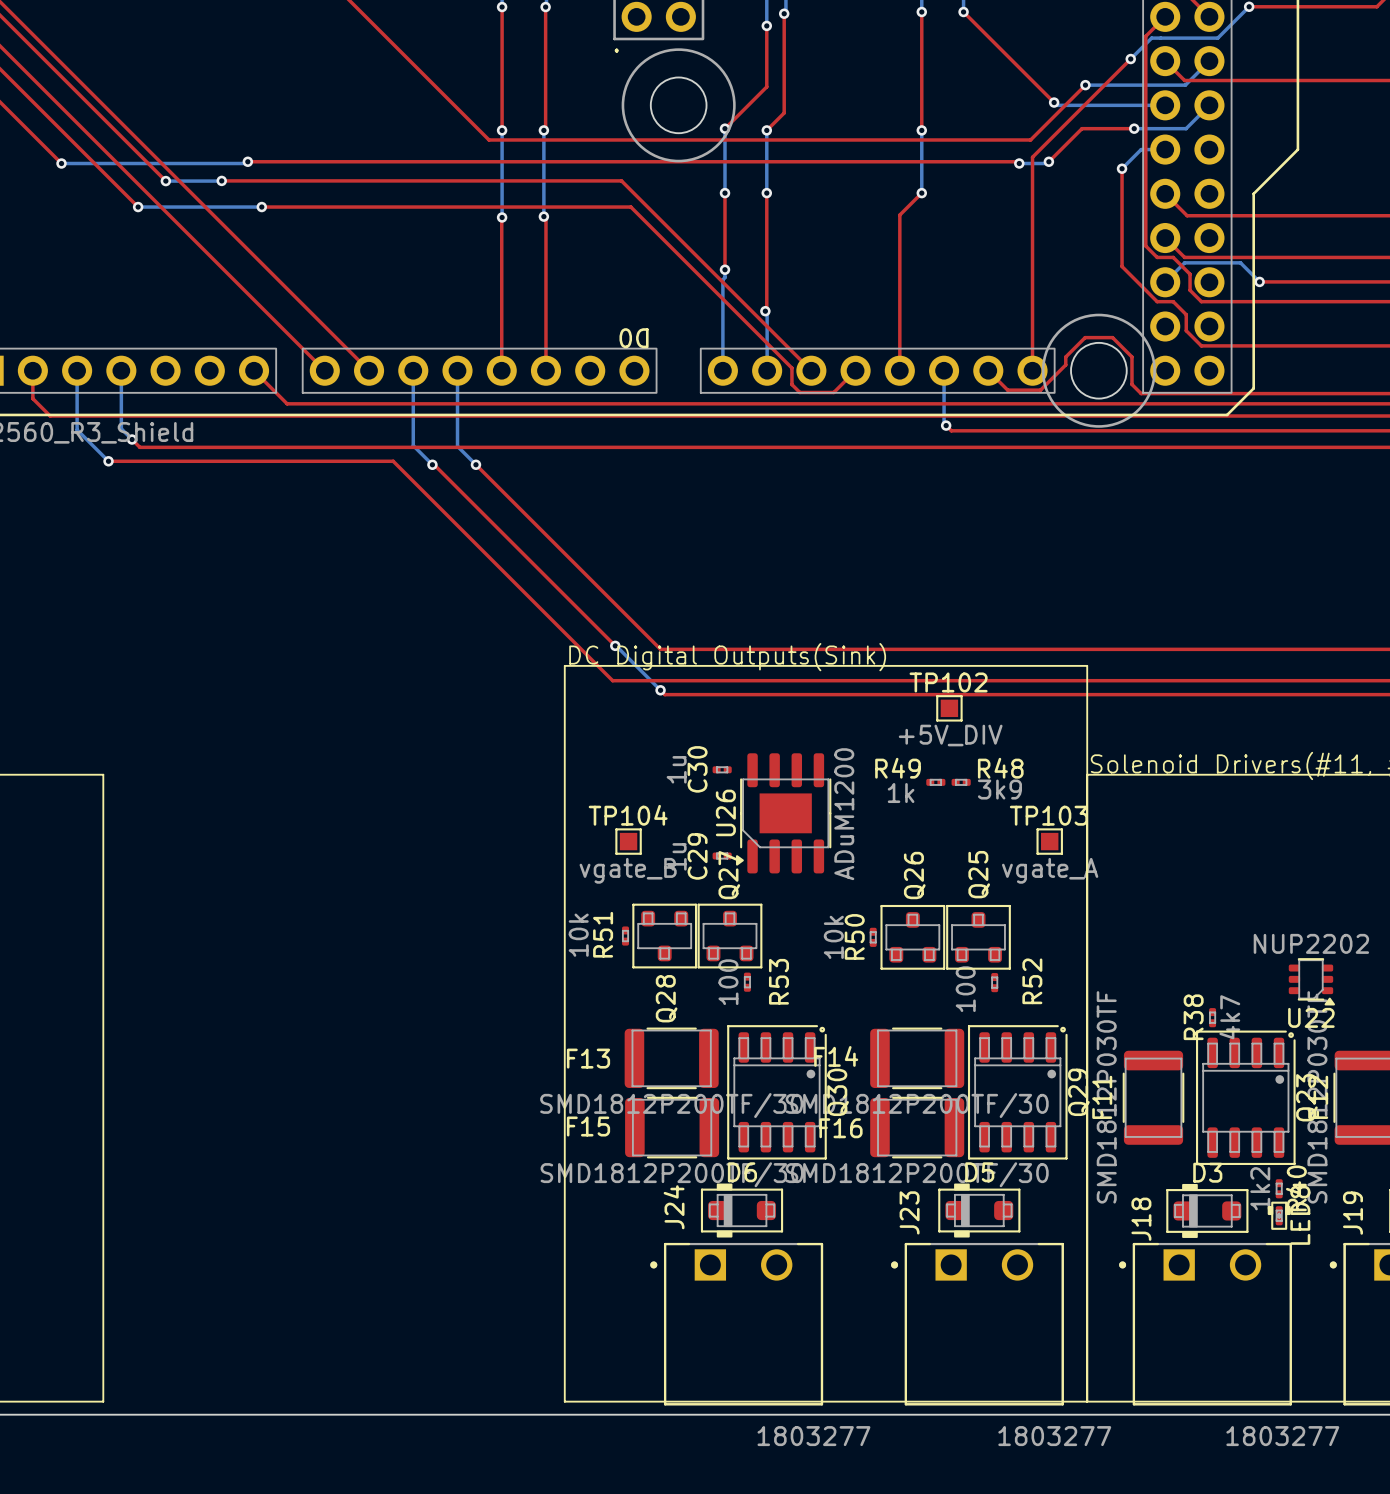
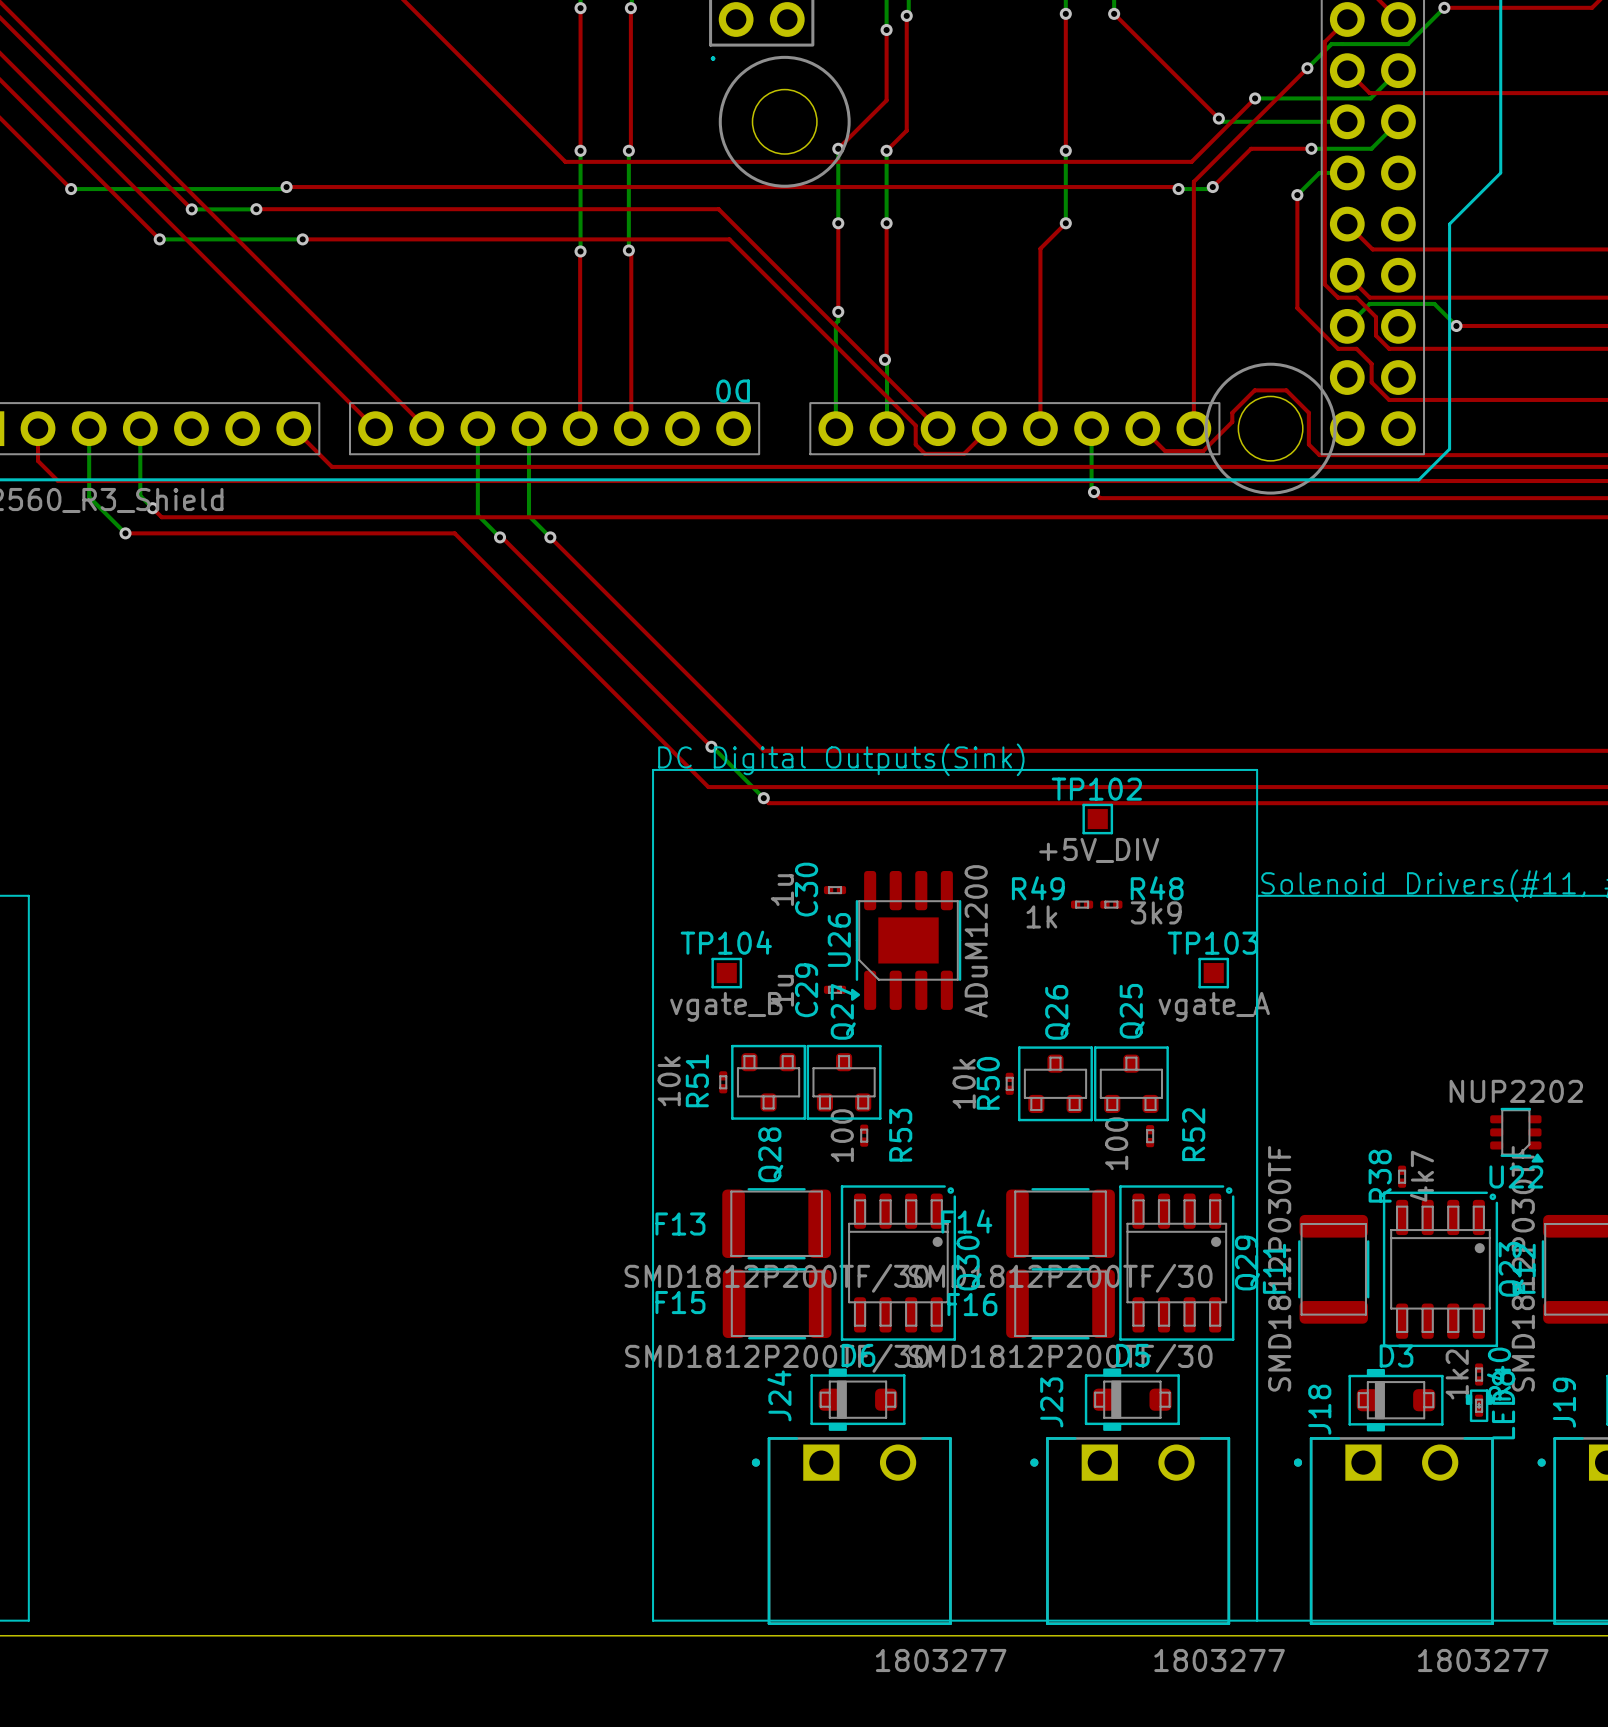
line: (24, 774) (103, 774) (103, 1401) (24, 1401) -> (28, 895) (28, 1620)

